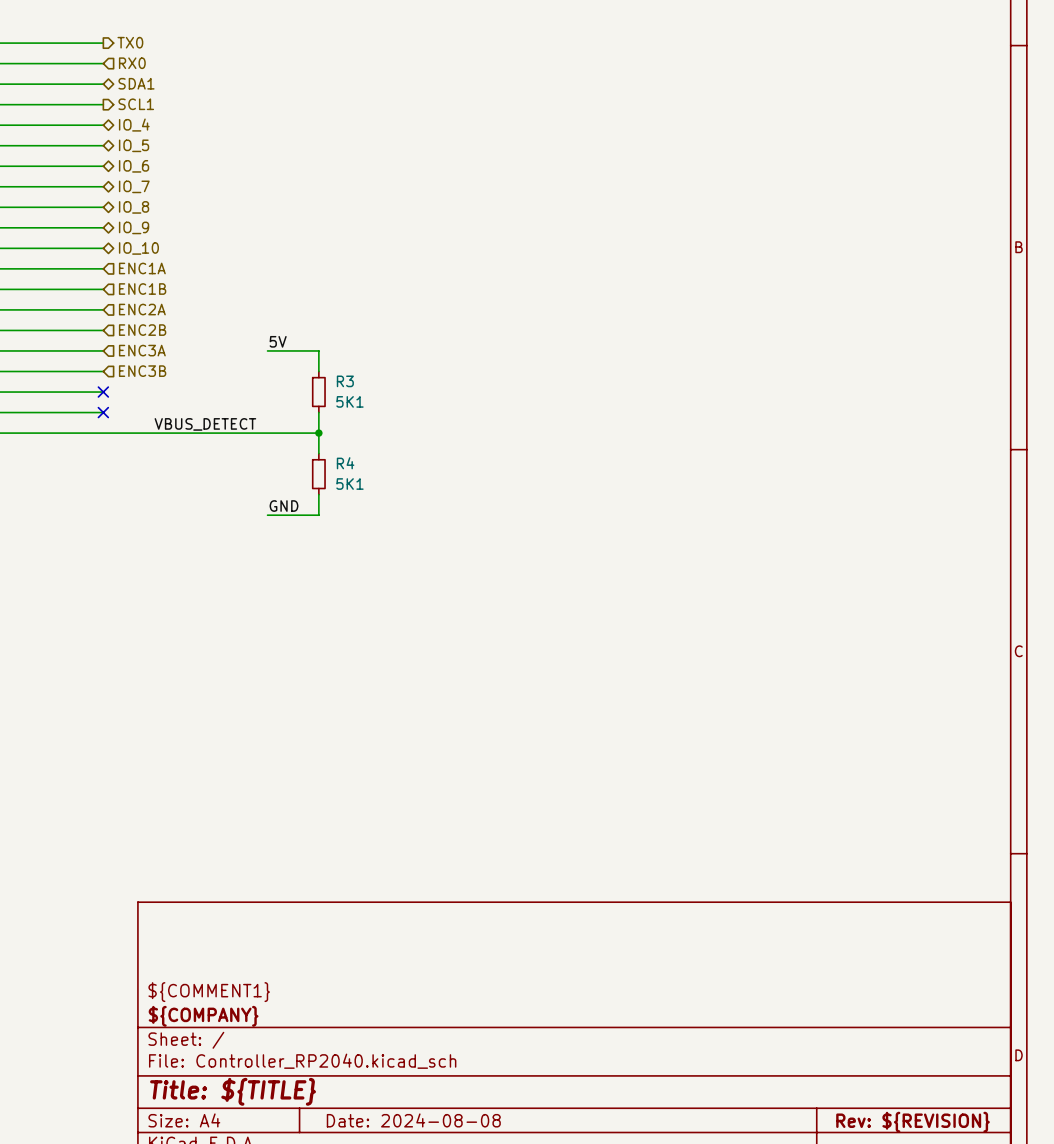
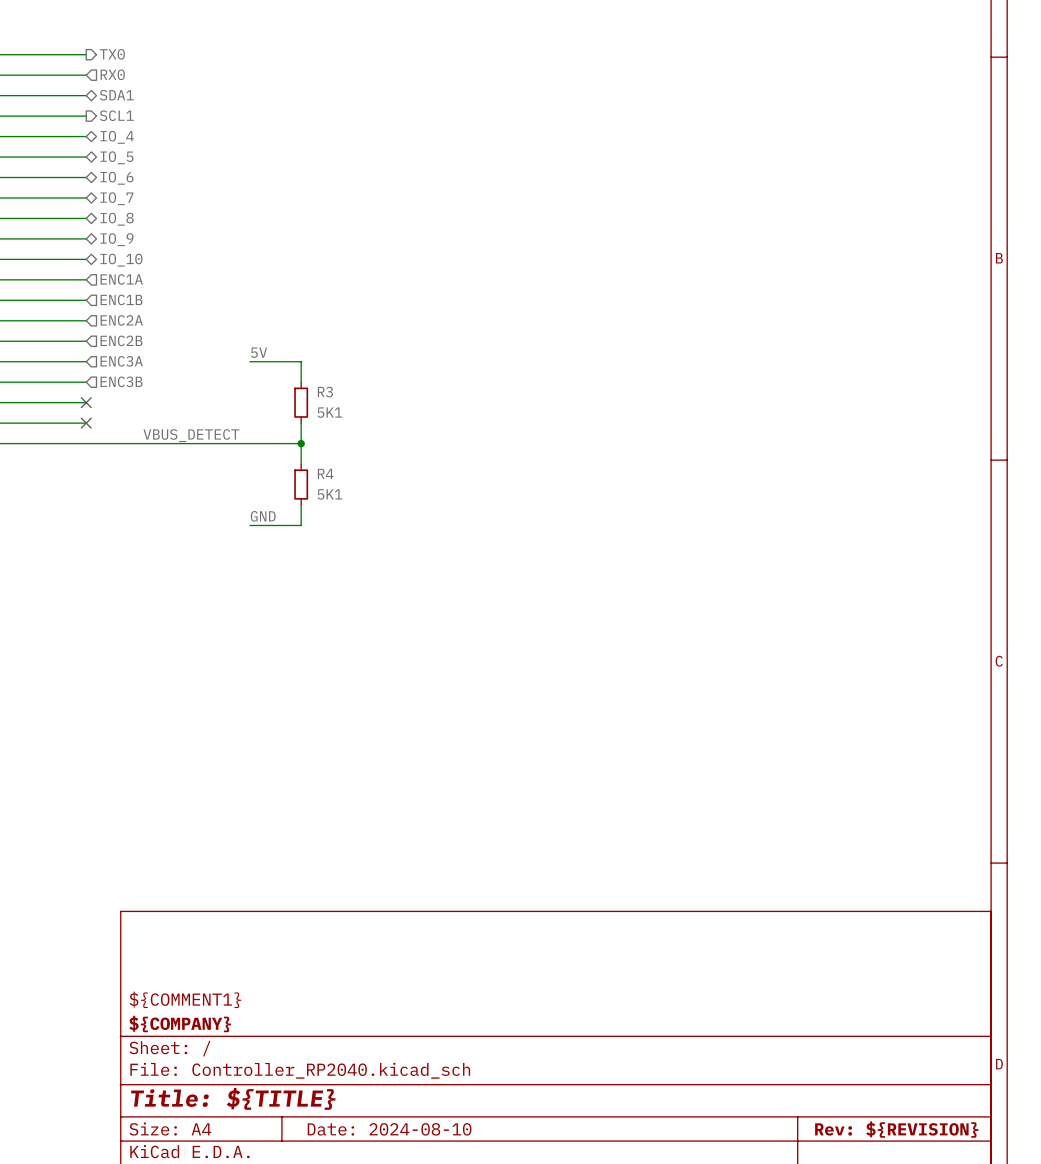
title block: Date: 2024-08-08 (413, 1120) -> Date: 2024-08-10 (389, 1129)

